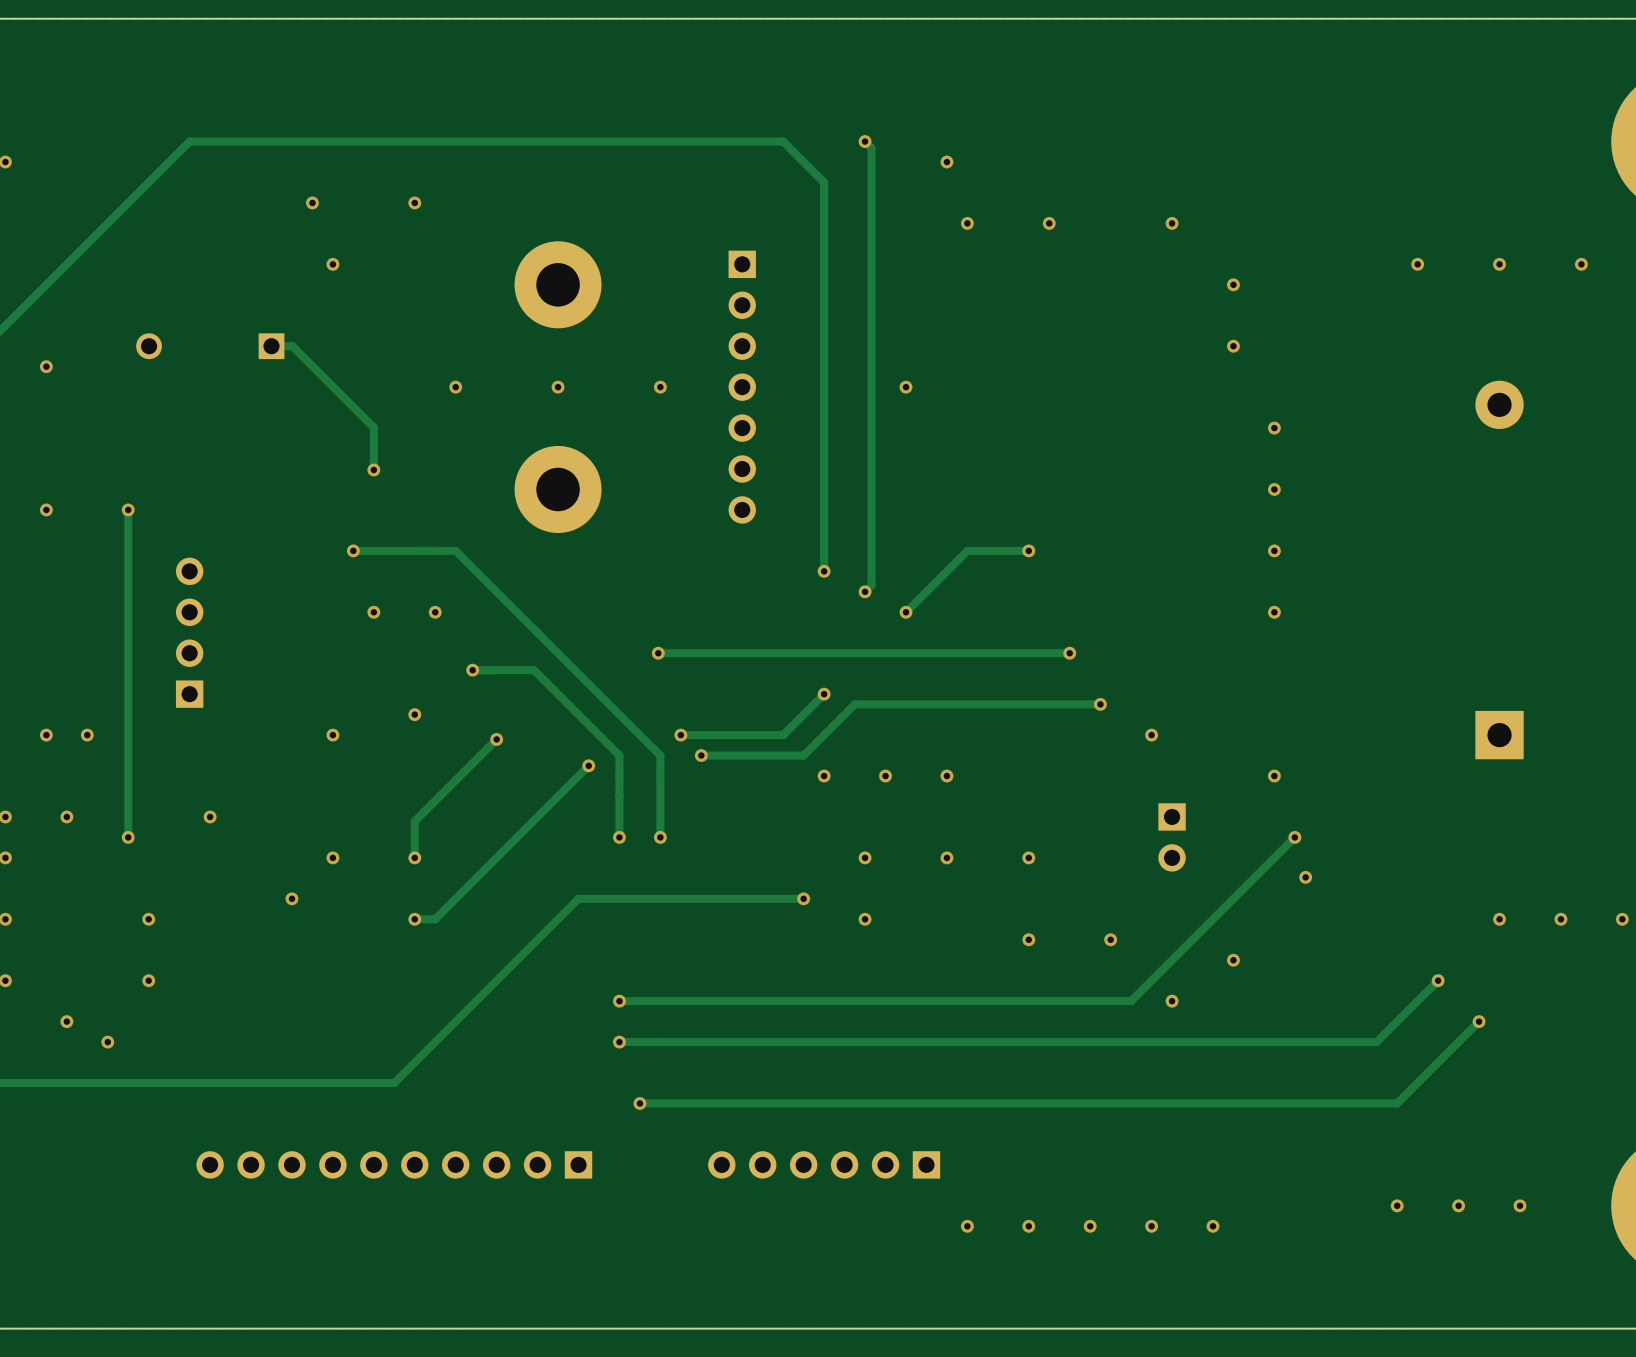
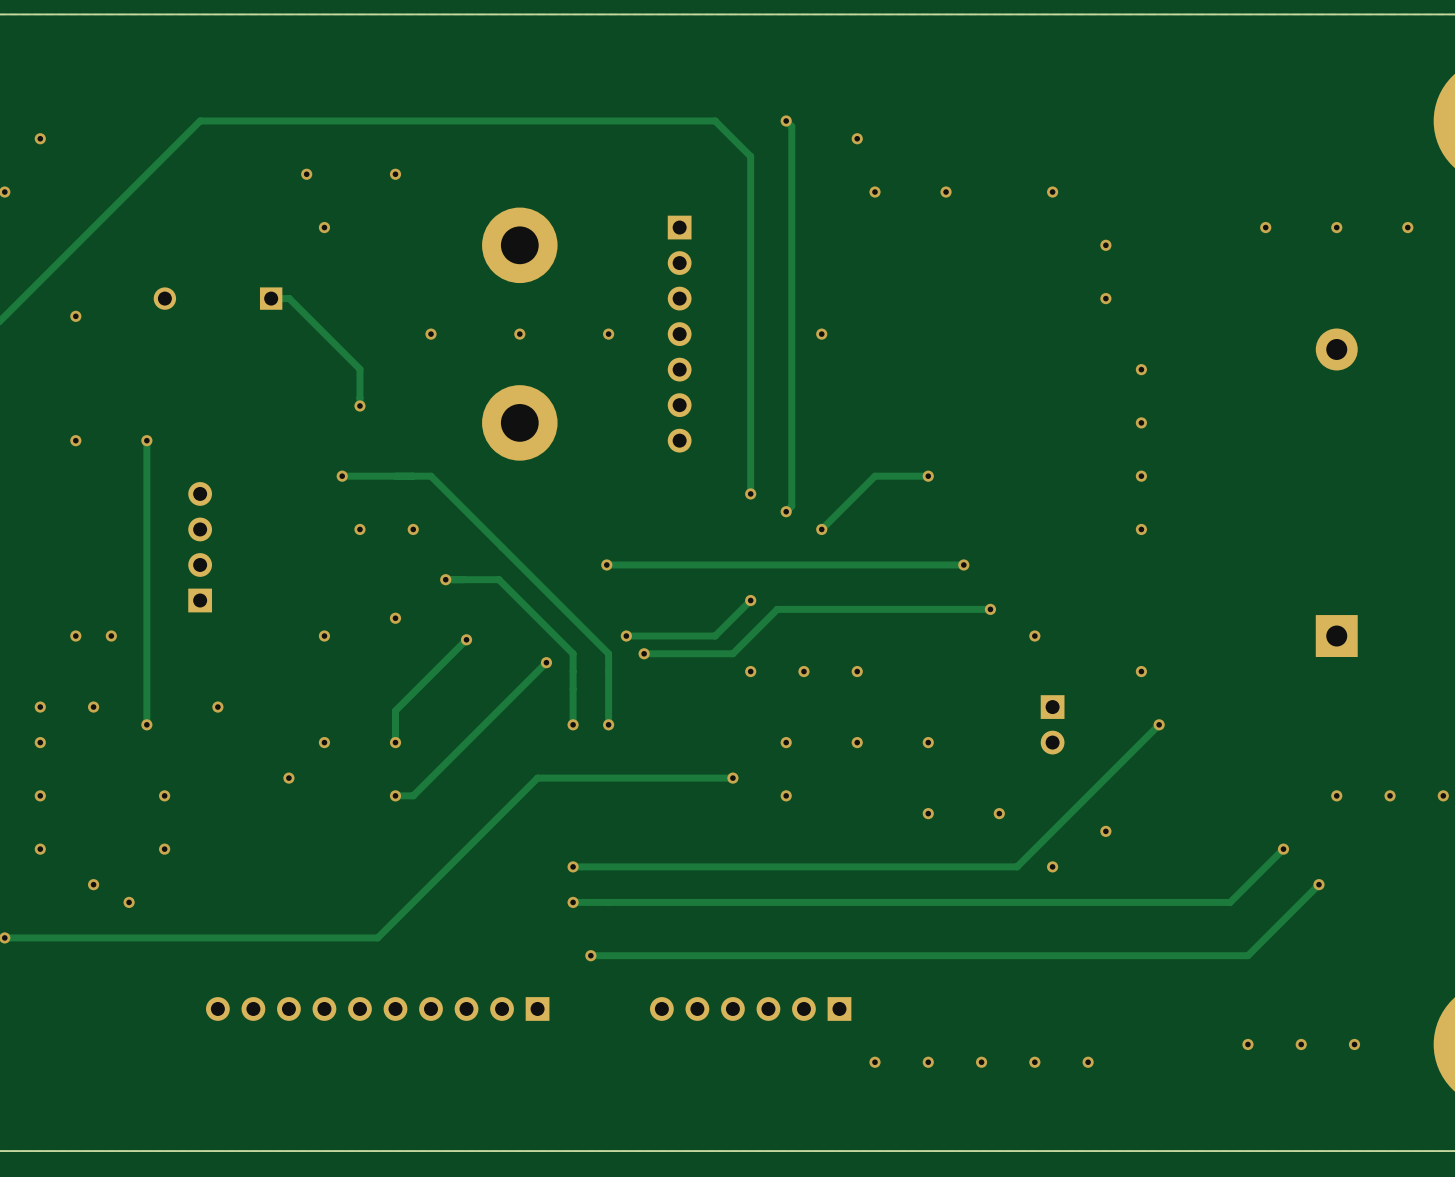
via: (1305, 877) -> none

